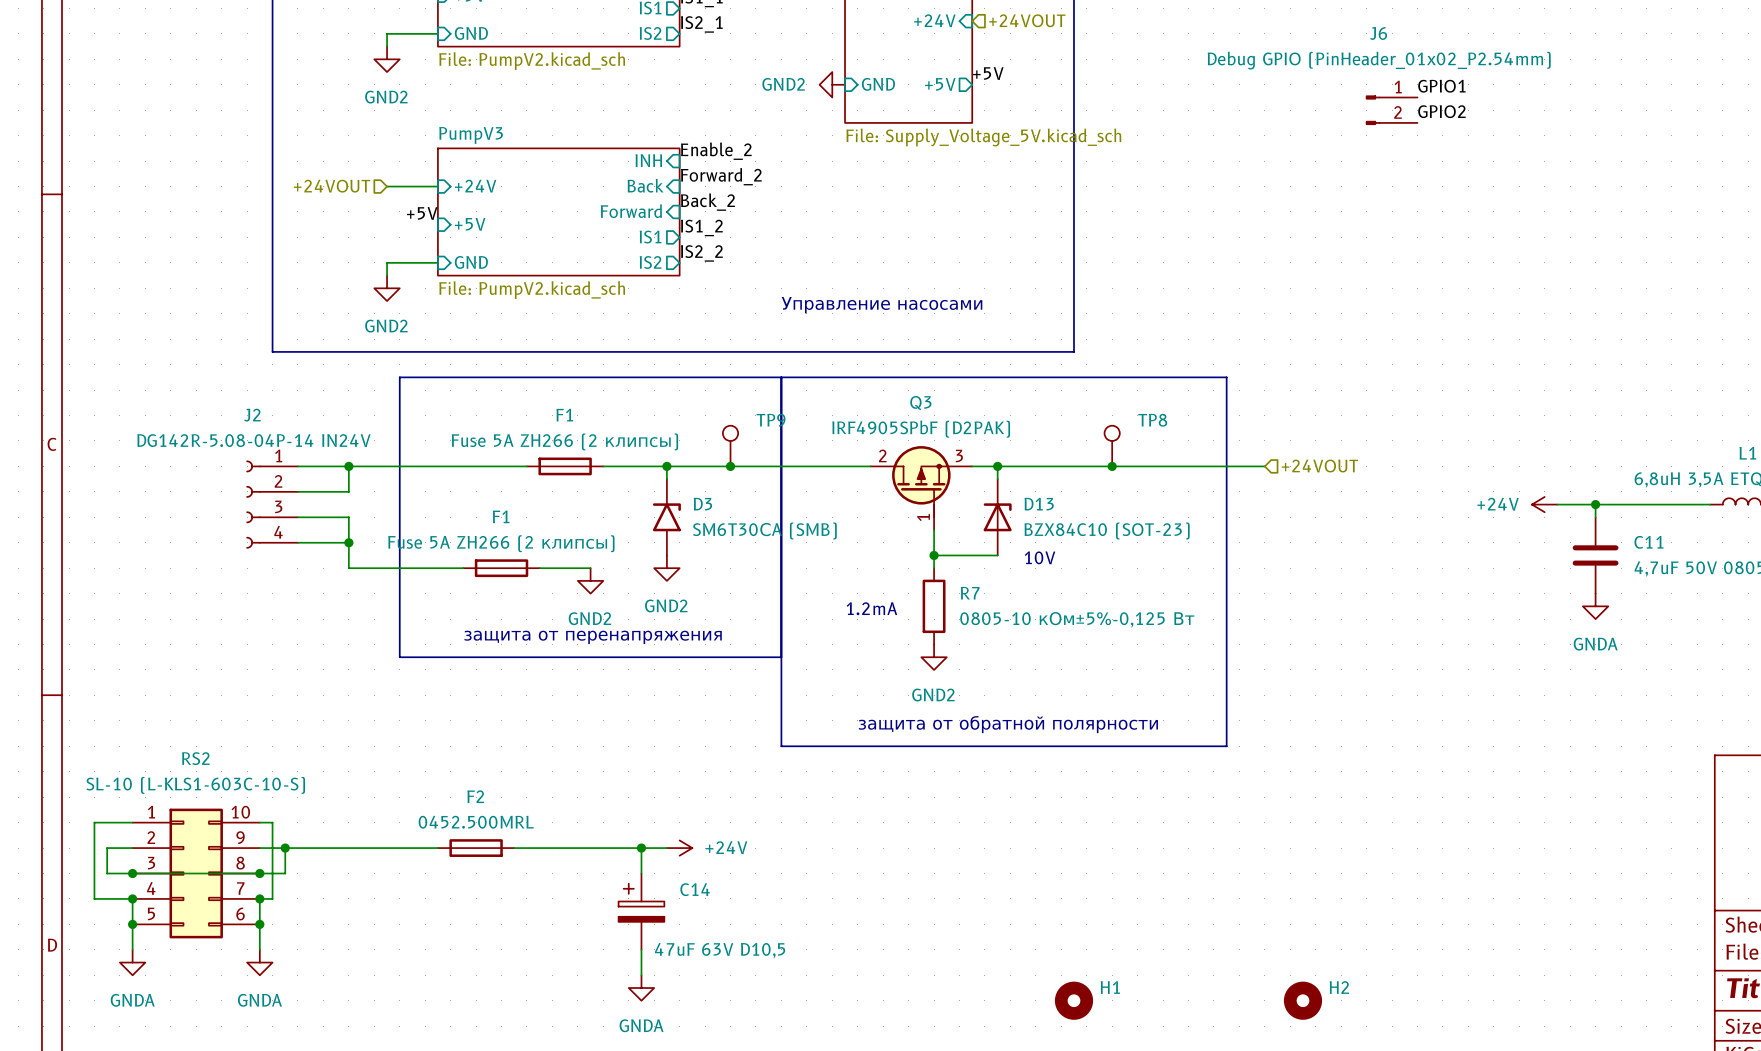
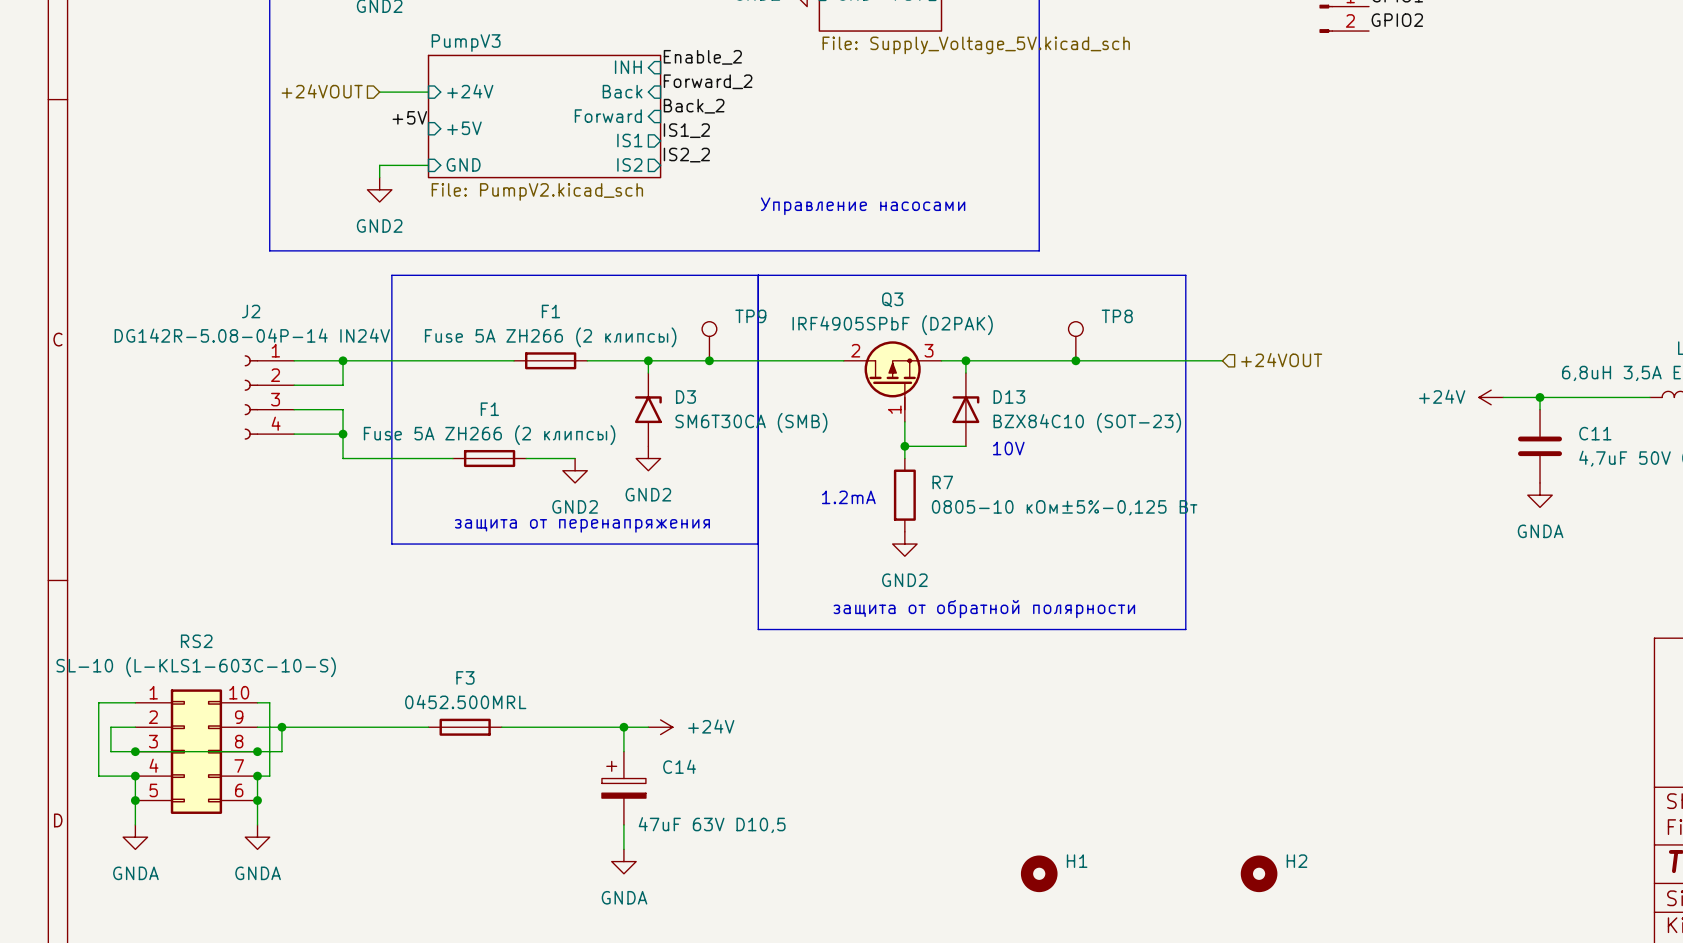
F2 name: F2 (475, 796) -> F3 (465, 677)

